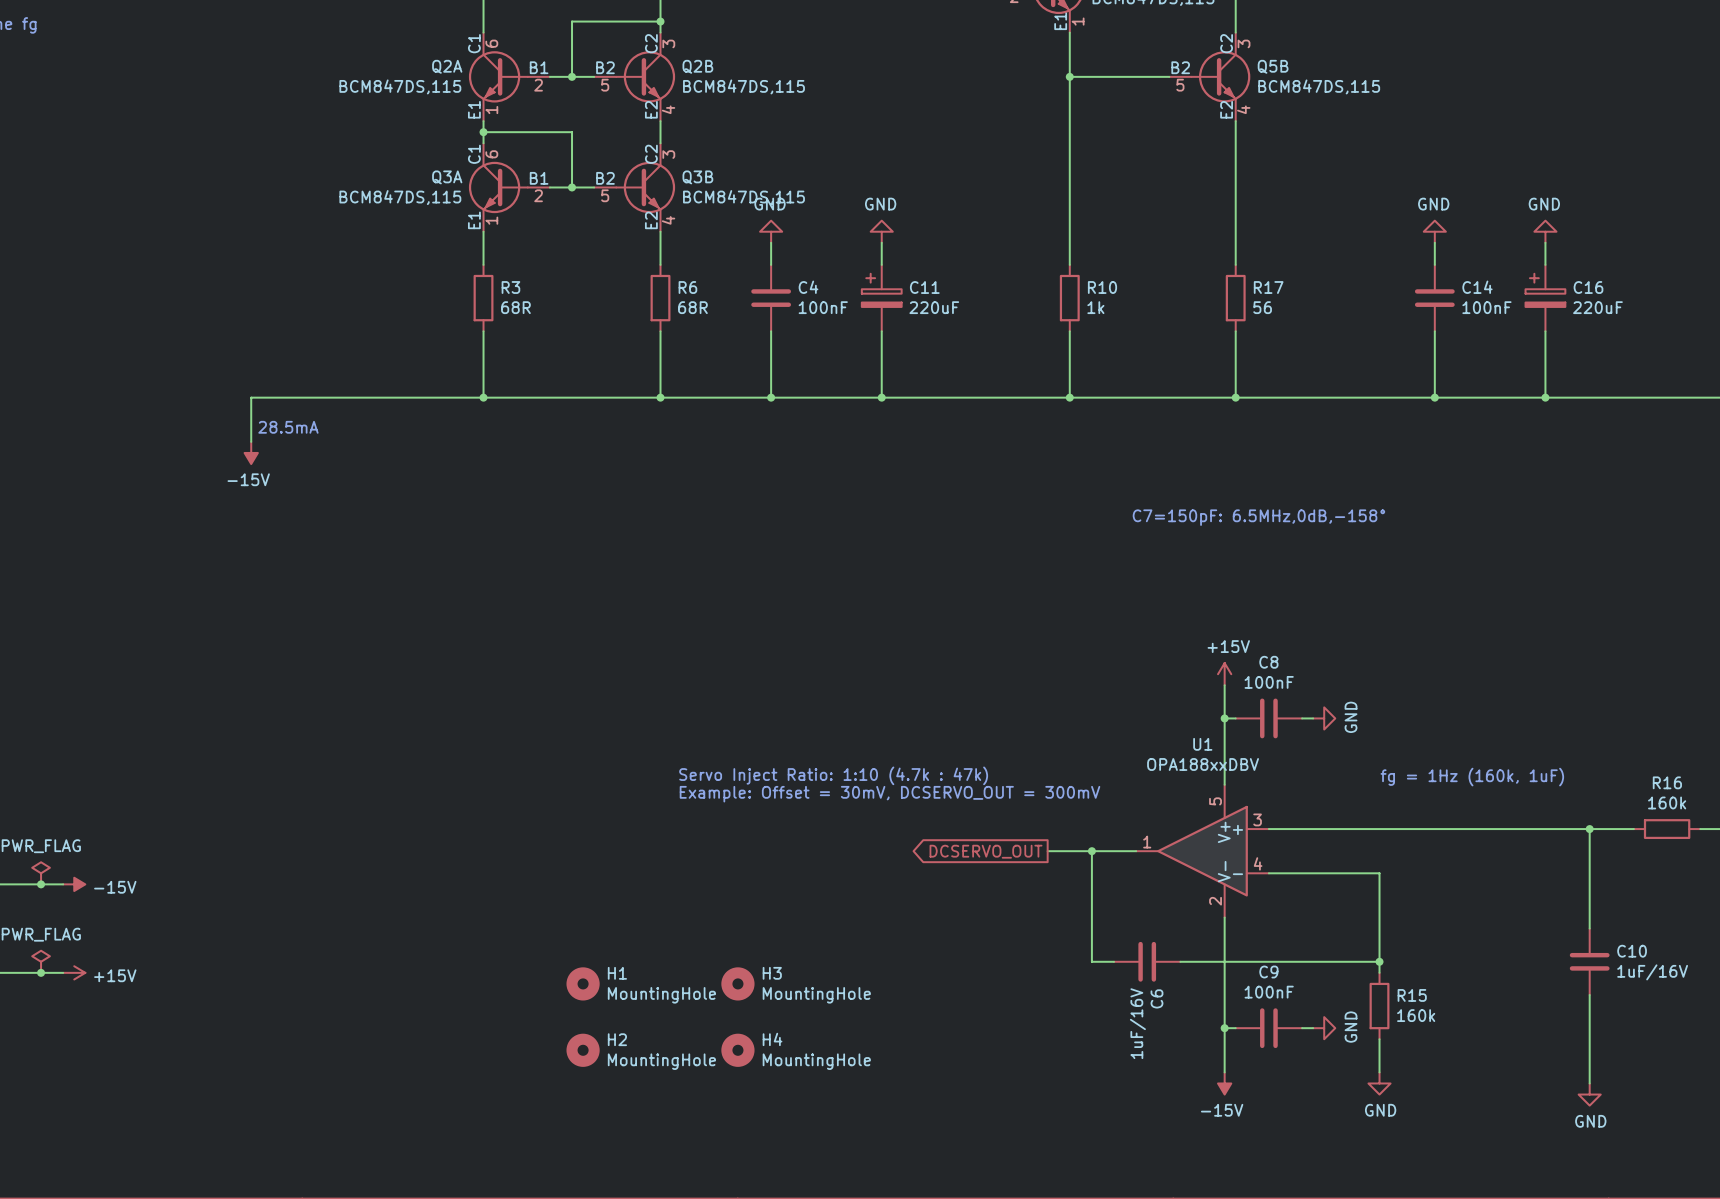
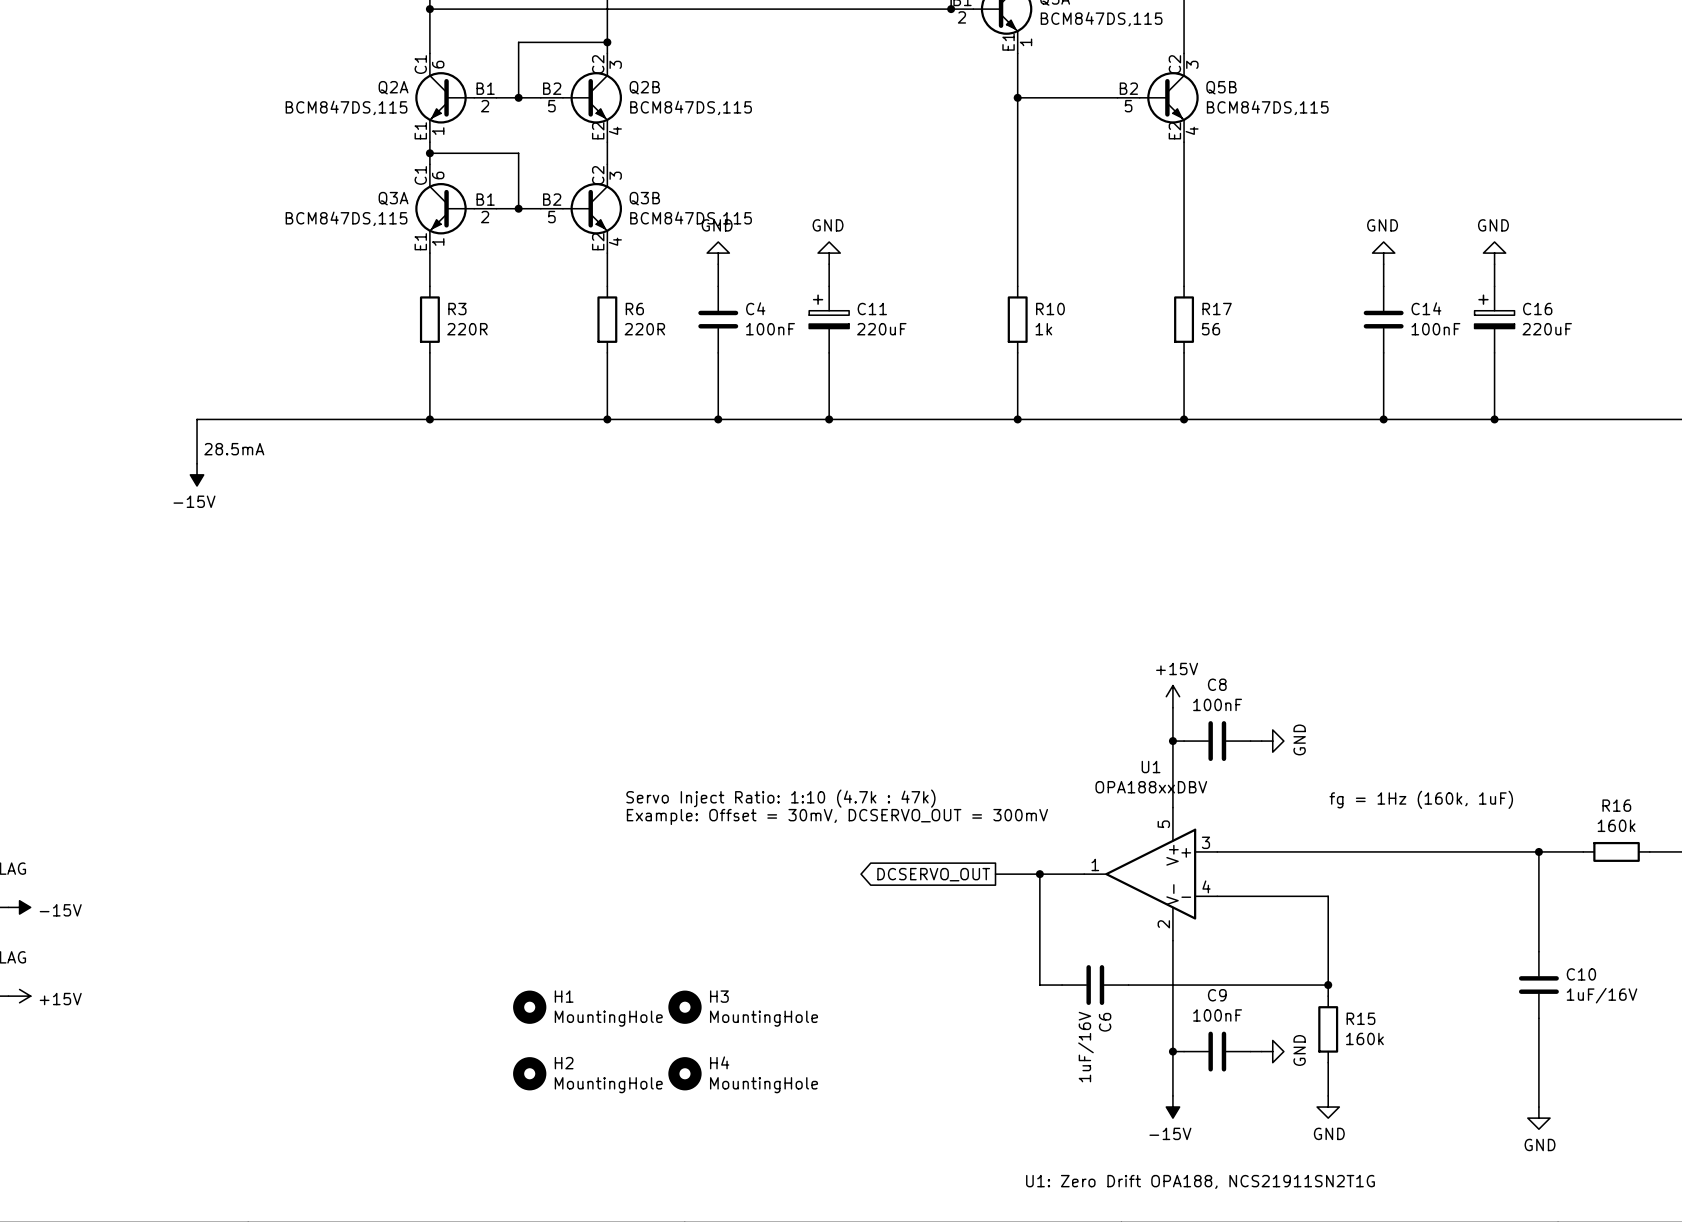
R3 value: 68R (515, 307) -> 220R (467, 329)
R6 value: 68R (692, 307) -> 220R (644, 329)
text: C7=150pF: 6.5MHz,0dB,-158° (1258, 517) -> none
text: none -> U1: Zero Drift OPA188, NCS21911SN2T1G (1200, 1181)

